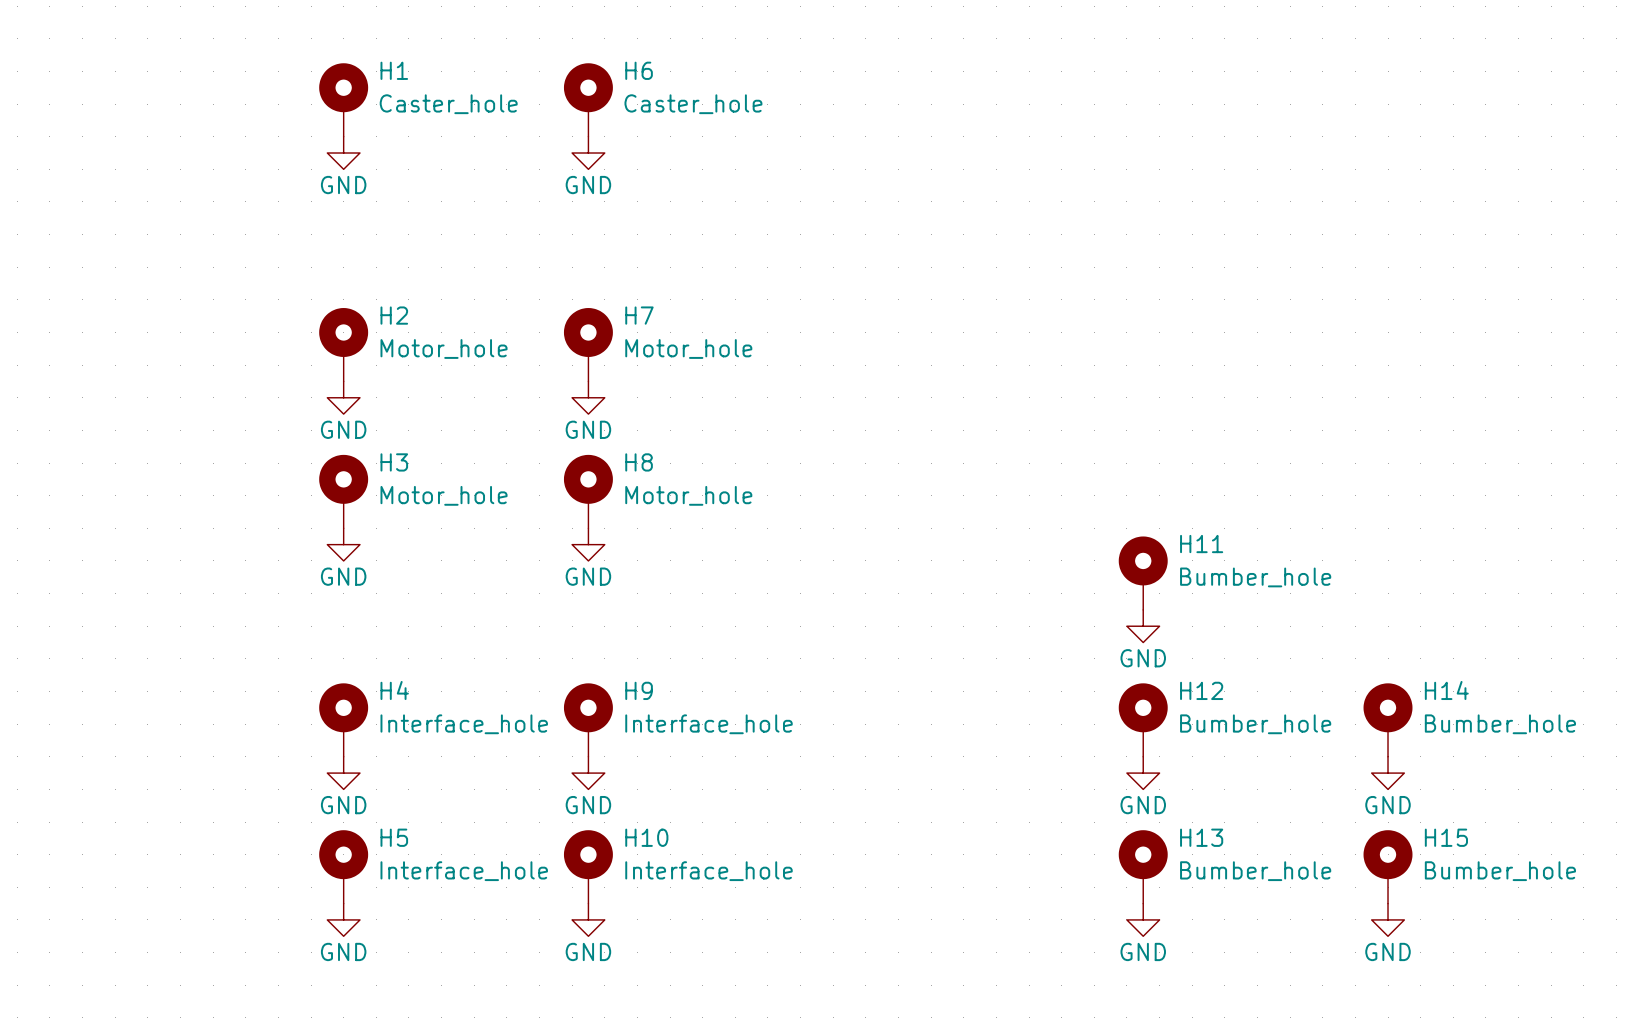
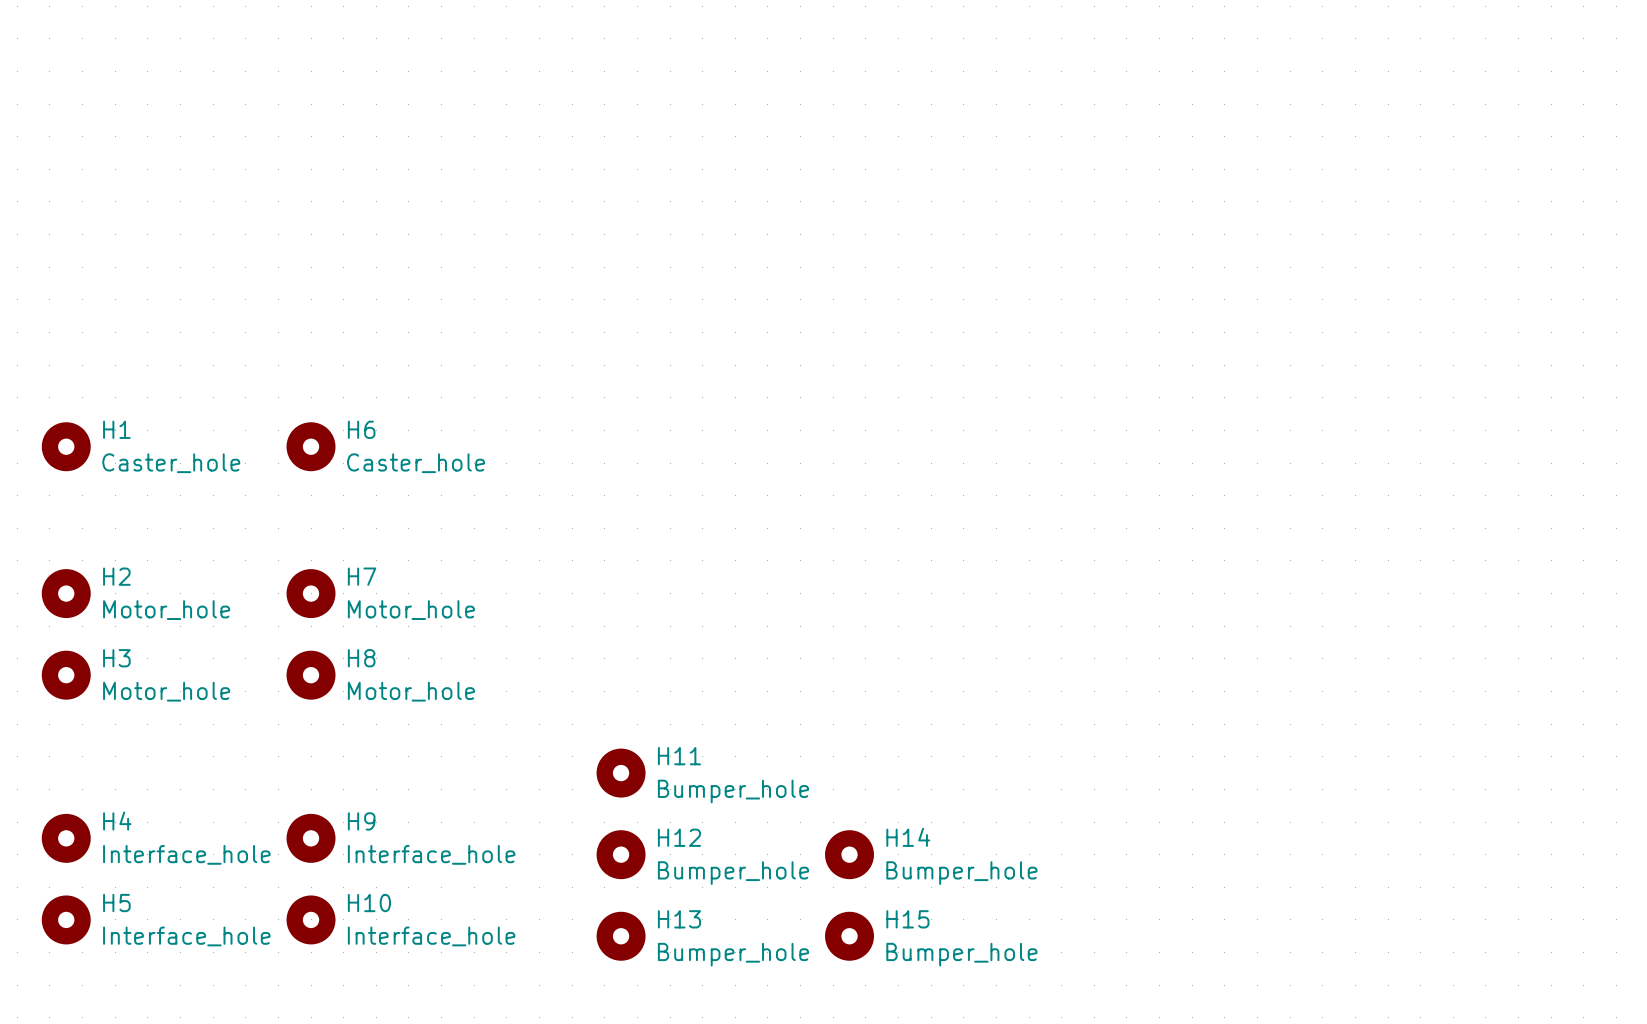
H1 symbol: [319, 63, 369, 137] -> [41, 422, 91, 472]
H6 symbol: [563, 63, 613, 137] -> [286, 422, 336, 472]
power symbol: GND (343, 153) -> none
power symbol: GND (588, 153) -> none
H2 symbol: [319, 308, 369, 382] -> [41, 569, 91, 619]
H7 symbol: [563, 308, 613, 382] -> [286, 569, 336, 619]
power symbol: GND (343, 397) -> none
power symbol: GND (588, 397) -> none
H3 symbol: [319, 454, 369, 529] -> [41, 650, 91, 700]
H8 symbol: [563, 454, 613, 529] -> [286, 650, 336, 700]
H11 symbol: [1118, 536, 1168, 610] -> [596, 748, 646, 798]
power symbol: GND (343, 544) -> none
power symbol: GND (588, 544) -> none
H11 value: Bumber_hole (1255, 577) -> Bumper_hole (733, 791)
power symbol: GND (1143, 626) -> none
H4 symbol: [319, 683, 369, 757] -> [41, 813, 91, 863]
H9 symbol: [563, 683, 613, 757] -> [286, 813, 336, 863]
H12 symbol: [1118, 683, 1168, 757] -> [596, 830, 646, 880]
H14 symbol: [1363, 683, 1413, 757] -> [825, 830, 874, 880]
H12 value: Bumber_hole (1255, 724) -> Bumper_hole (733, 873)
H14 value: Bumber_hole (1500, 724) -> Bumper_hole (961, 873)
power symbol: GND (343, 773) -> none
power symbol: GND (588, 773) -> none
power symbol: GND (1143, 773) -> none
power symbol: GND (1388, 773) -> none
H5 symbol: [319, 830, 369, 904] -> [41, 895, 91, 945]
H10 symbol: [563, 830, 613, 904] -> [286, 895, 336, 945]
H13 symbol: [1118, 830, 1168, 904] -> [596, 911, 646, 961]
H15 symbol: [1363, 830, 1413, 904] -> [825, 911, 874, 961]
H13 value: Bumber_hole (1255, 871) -> Bumper_hole (733, 954)
H15 value: Bumber_hole (1500, 871) -> Bumper_hole (961, 954)
power symbol: GND (343, 919) -> none
power symbol: GND (588, 919) -> none
power symbol: GND (1143, 919) -> none
power symbol: GND (1388, 919) -> none

